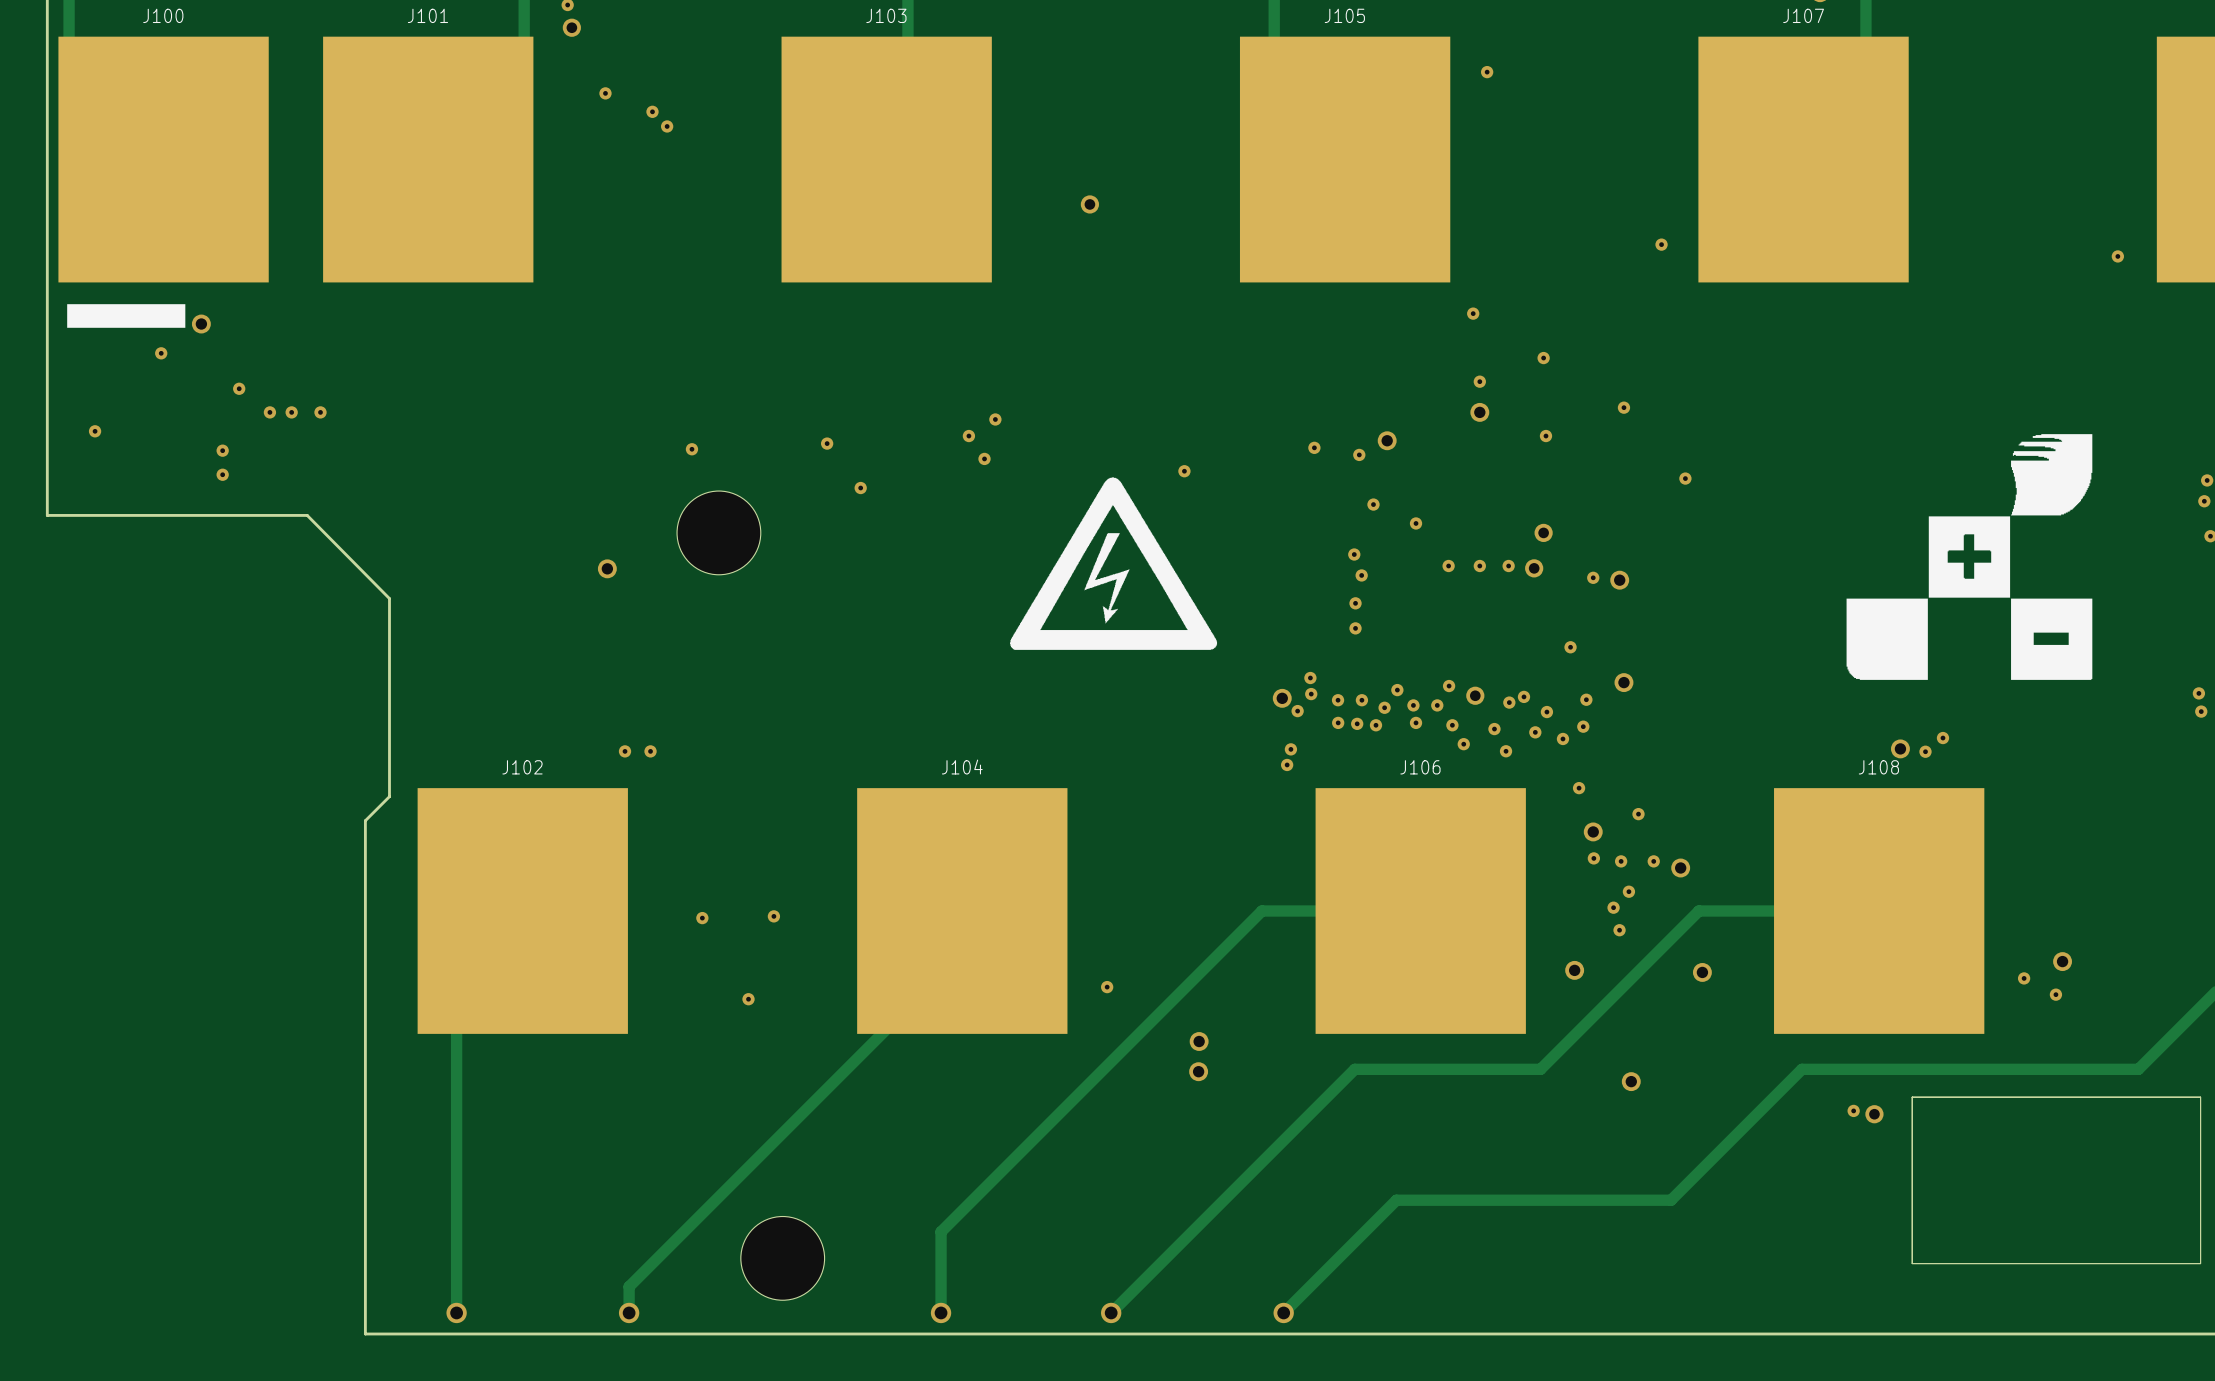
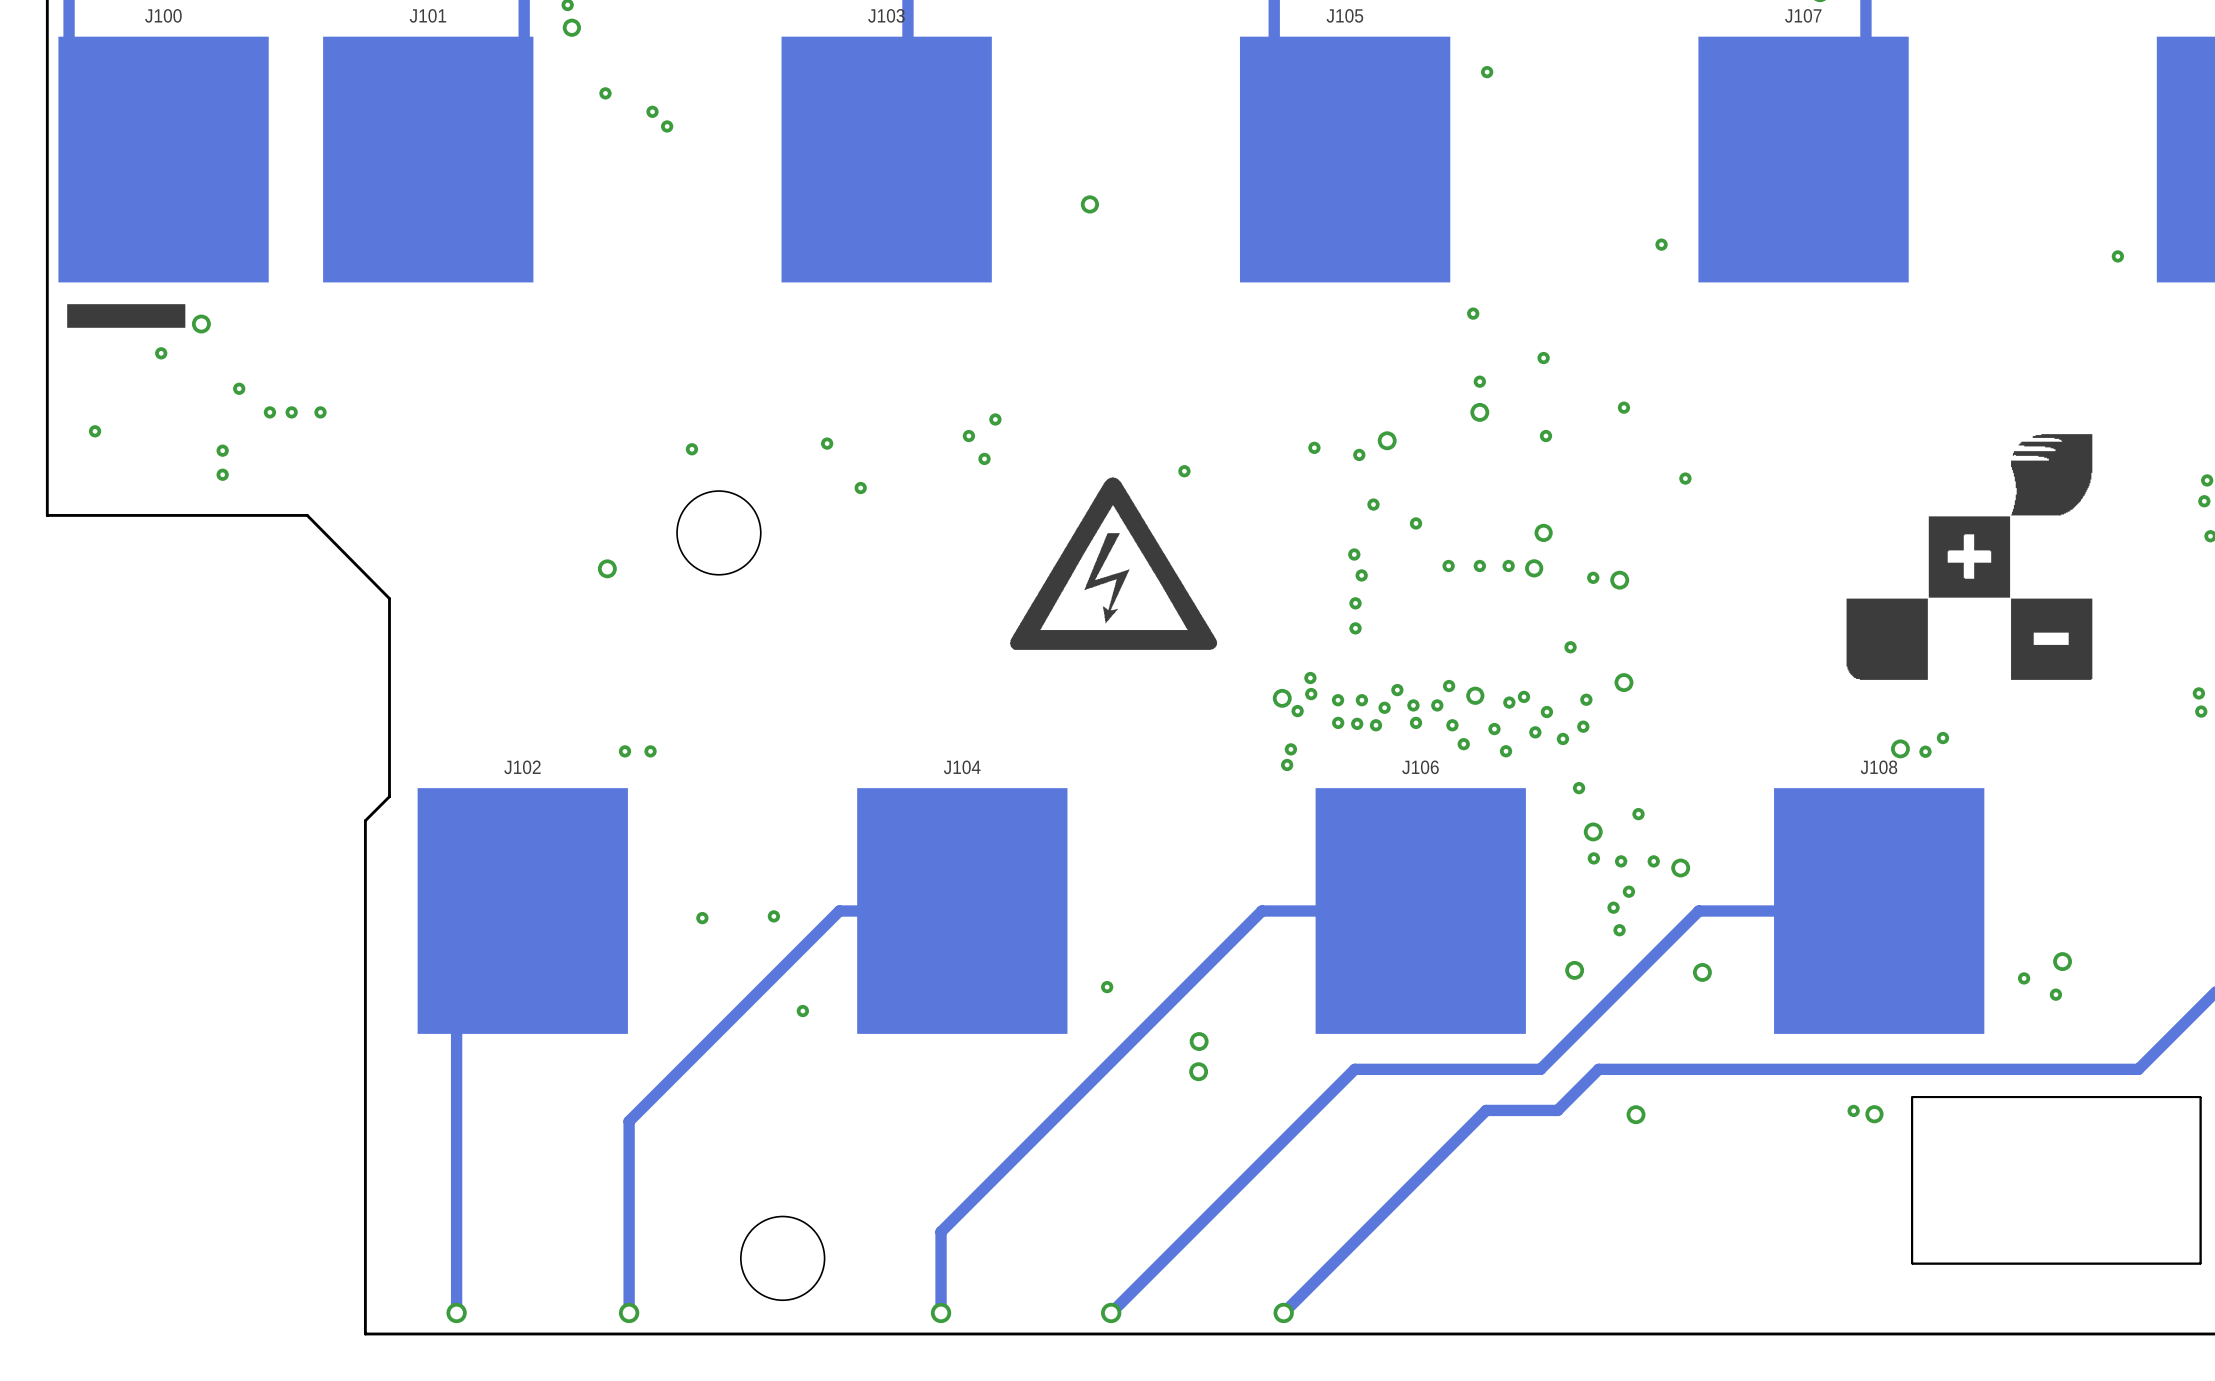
track: (962, 911) (962, 953) (629, 1286) -> (962, 911) (839, 911) (629, 1121) (629, 1286)
via position: (748, 999) -> (802, 1011)
track: (1801, 1069) (1671, 1200) (1396, 1200) -> (1801, 1069) (1598, 1069) (1557, 1110) (1486, 1110) (1396, 1200)
via position: (1631, 1081) -> (1636, 1114)

